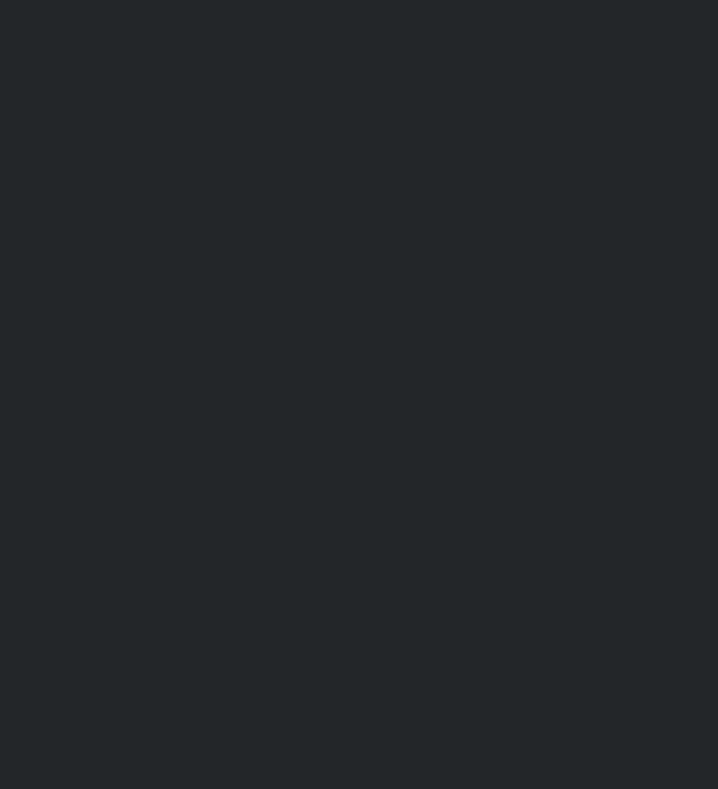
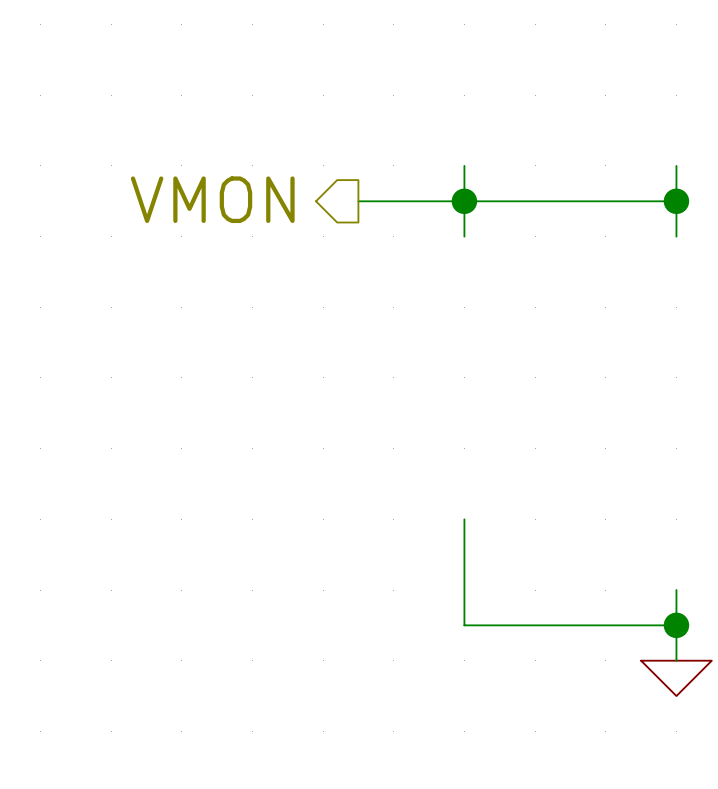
wire: none -> (464, 165) (464, 236)
wire: none -> (676, 165) (676, 236)
hierarchical label: none -> VMON (212, 199)
wire: none -> (358, 201) (676, 201)
junction: none -> (464, 201)
junction: none -> (676, 201)
wire: none -> (464, 519) (464, 625) (676, 625)
wire: none -> (676, 590) (676, 660)
junction: none -> (676, 625)
power symbol: none -> (676, 678)

